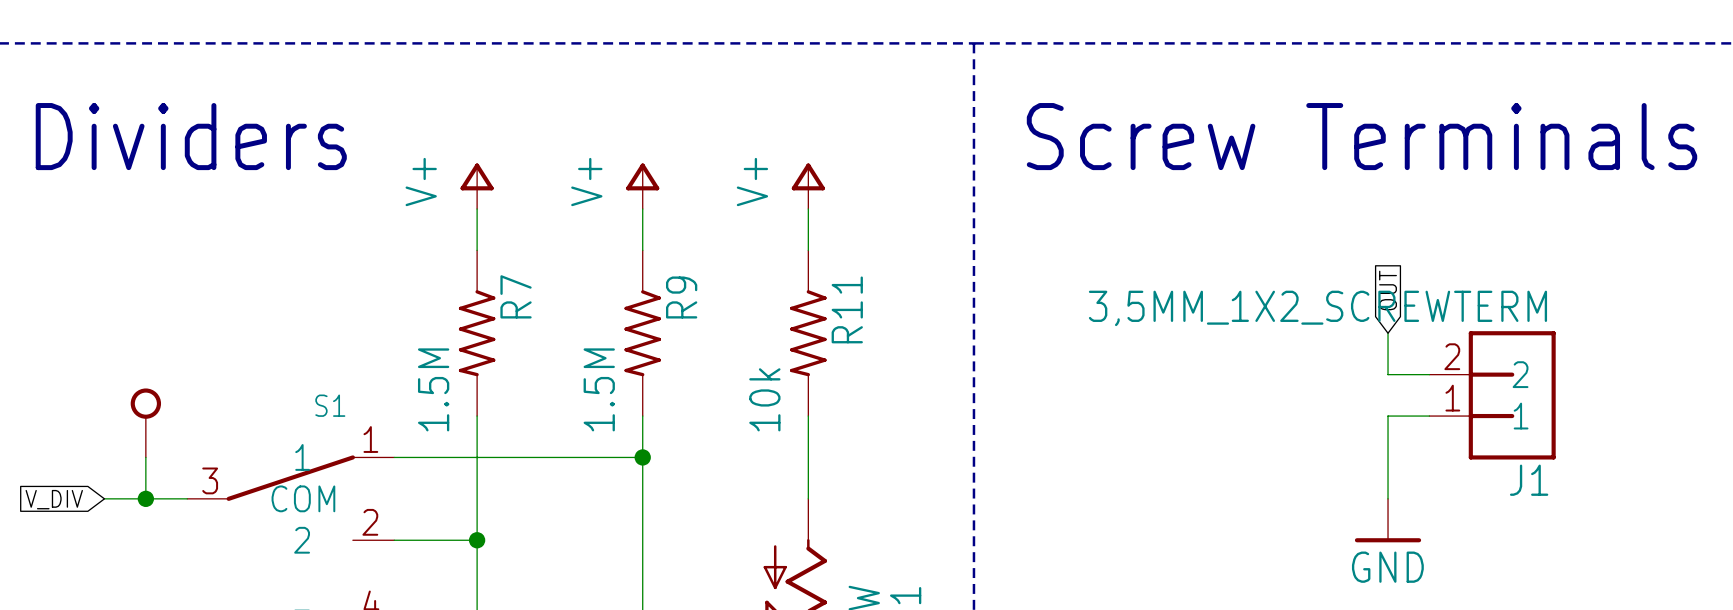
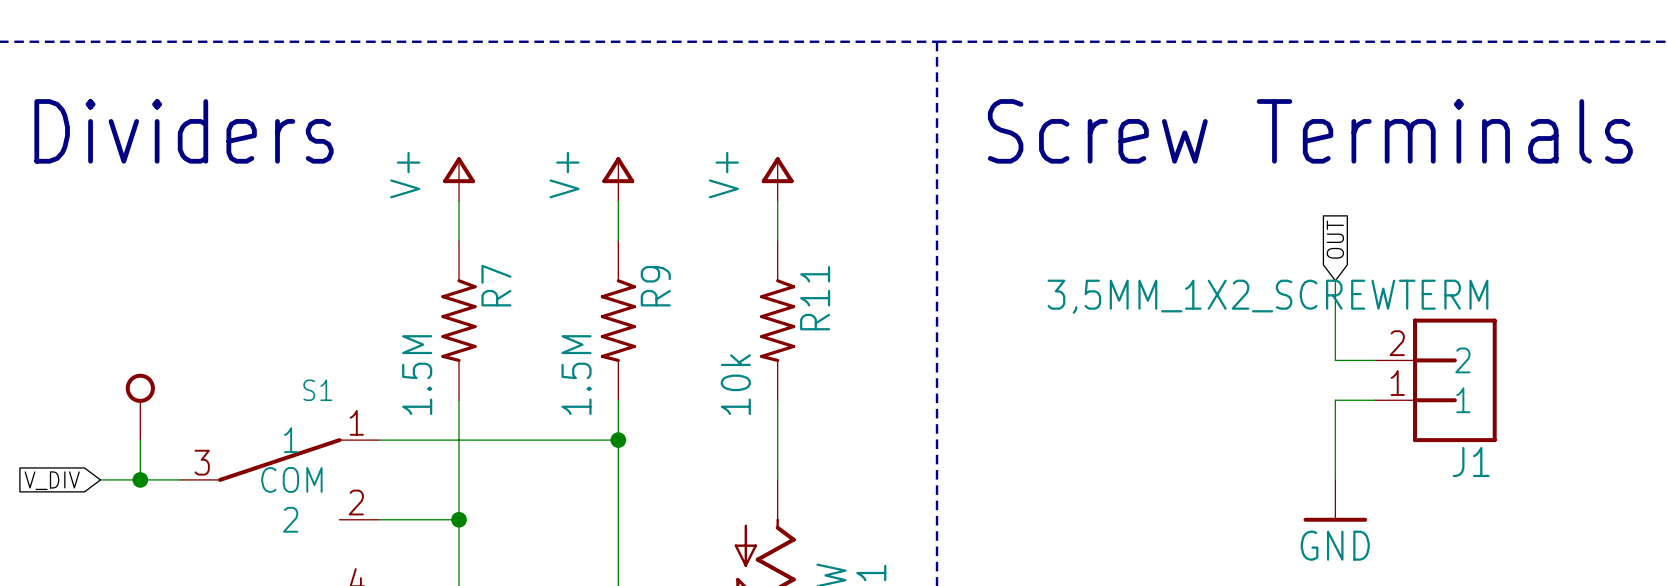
global label position: OUT (1388, 290) -> OUT (1335, 239)
wire: none -> (1335, 280) (1335, 320)

